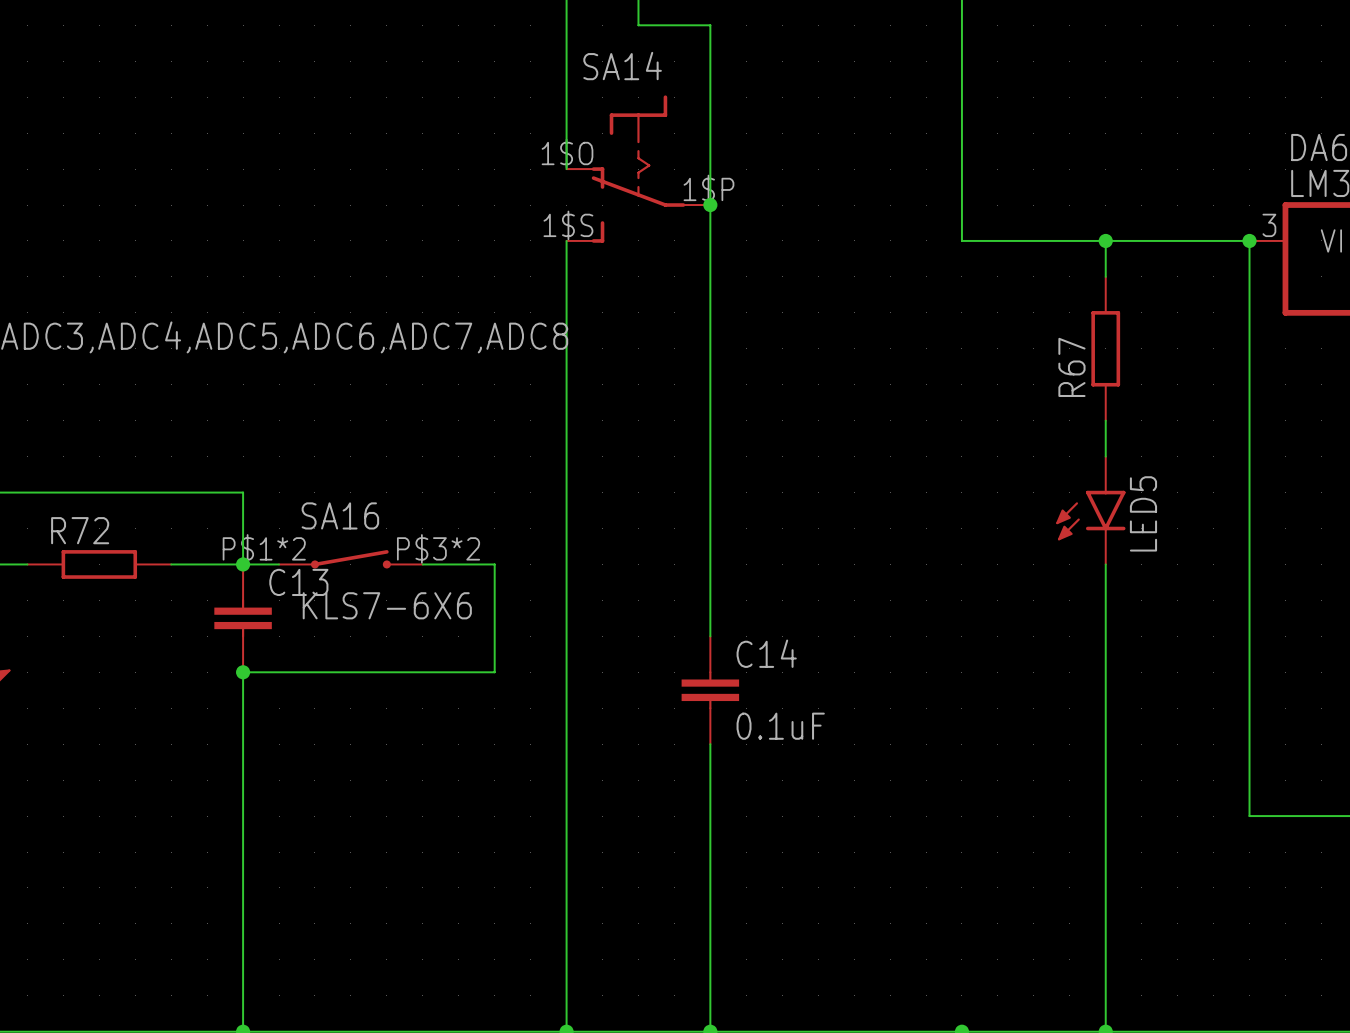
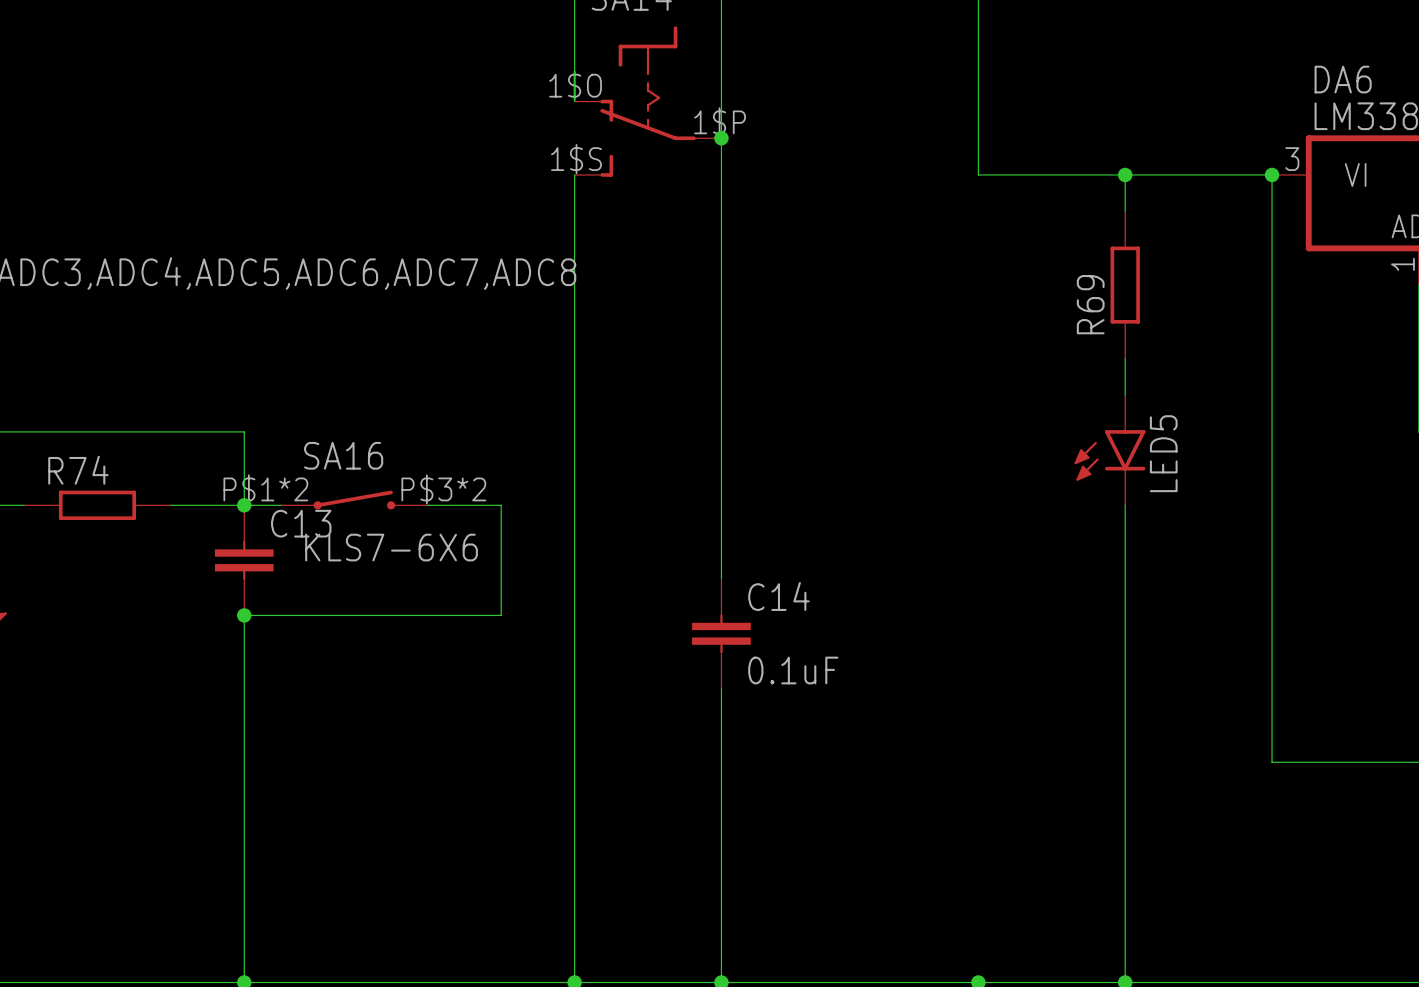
R67 name: R67 (1071, 367) -> R69 (1090, 304)
R72 name: R72 (80, 530) -> R74 (78, 470)

